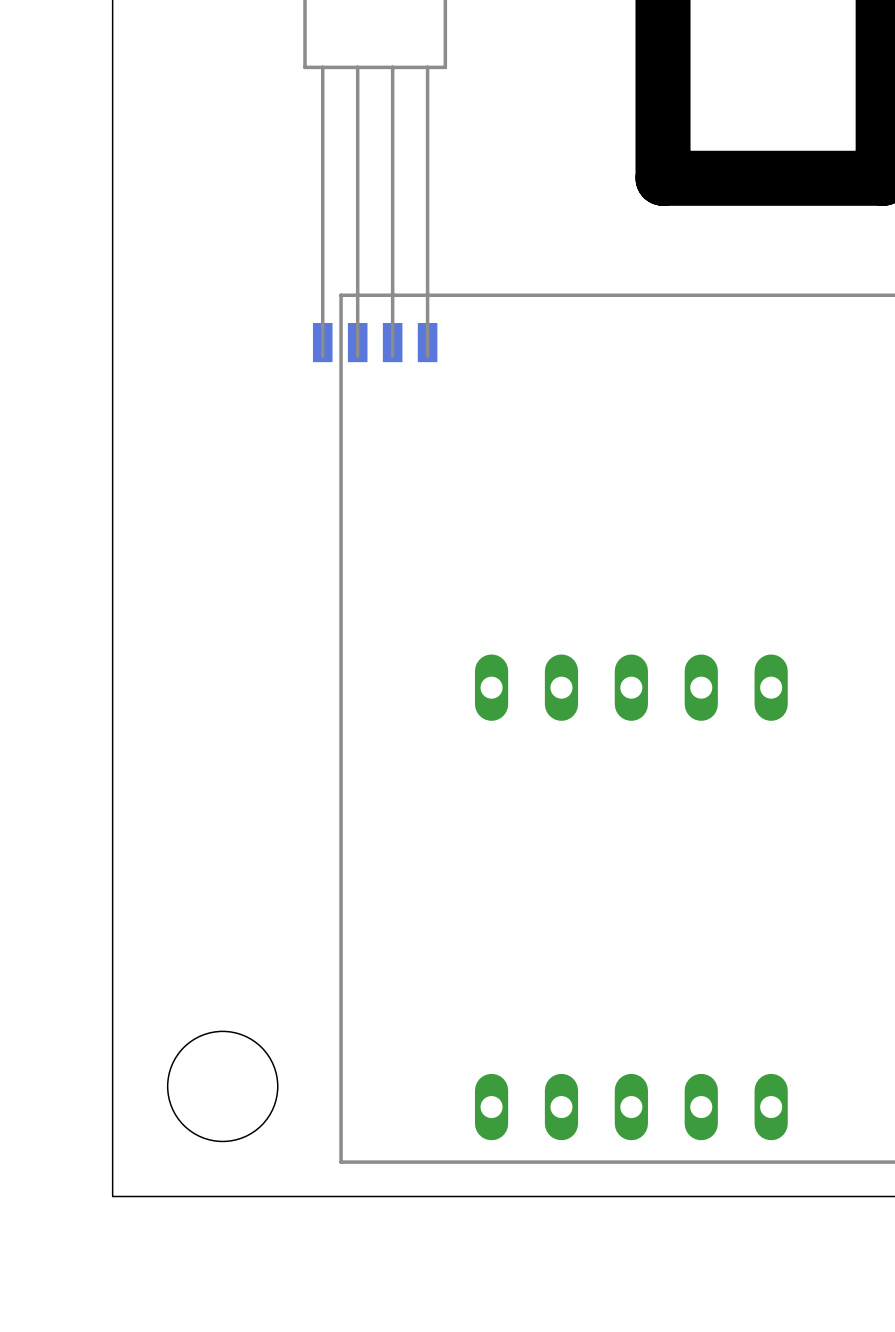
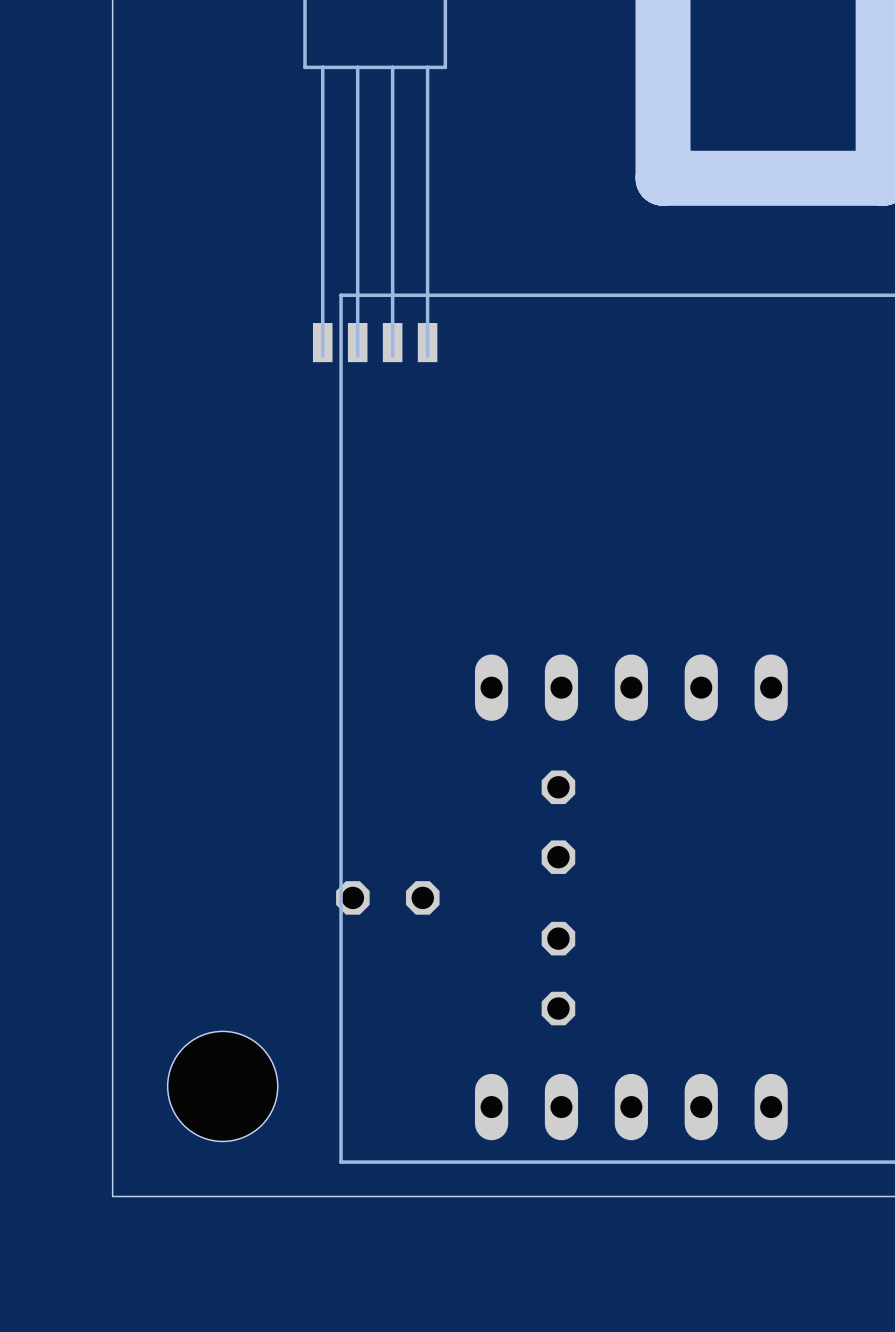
part: none -> (558, 822)
part: none -> (387, 897)
part: none -> (558, 973)

